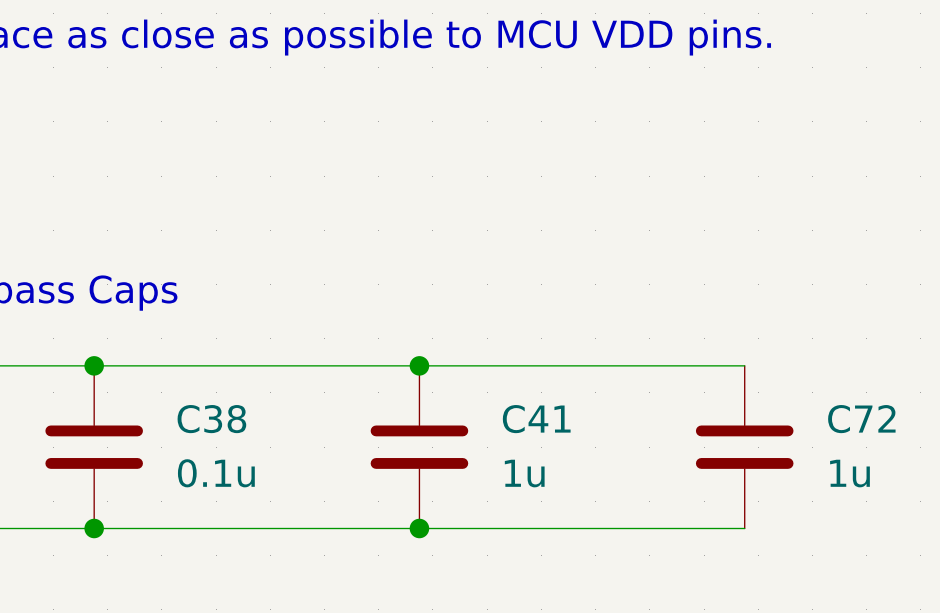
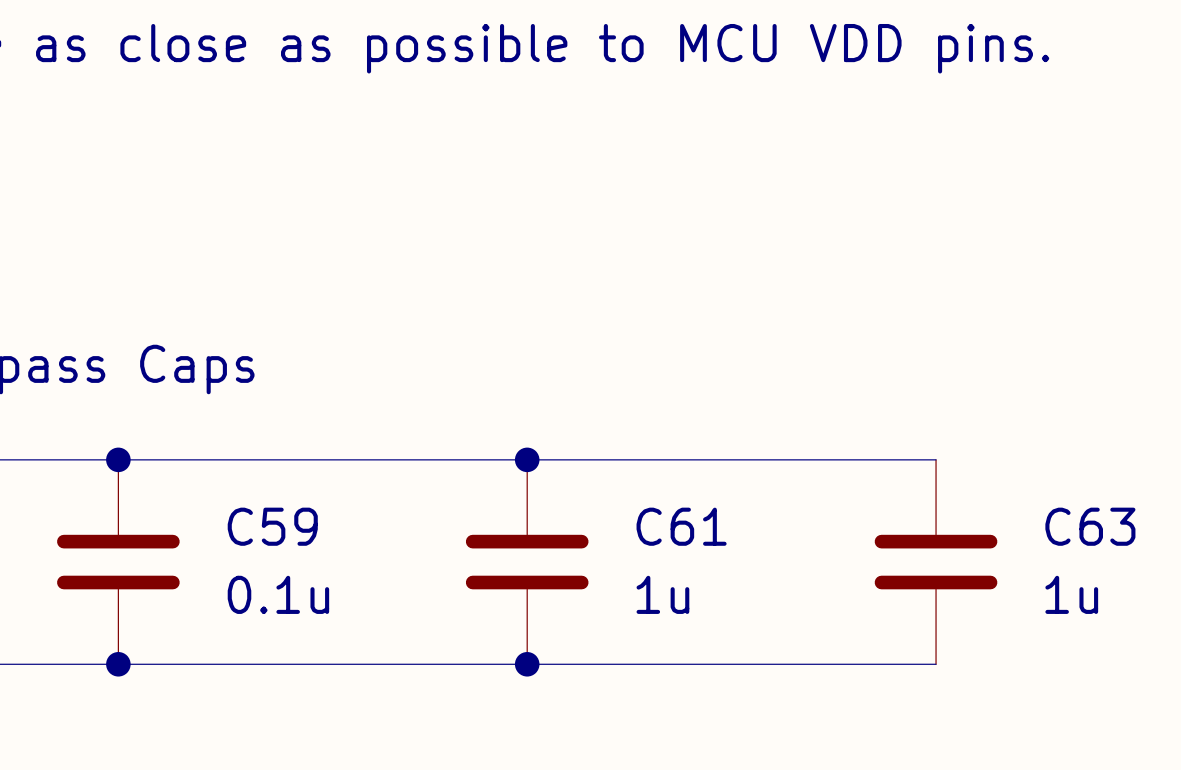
C38 name: C38 (211, 419) -> C59 (272, 526)
C41 name: C41 (536, 419) -> C61 (681, 526)
C72 name: C72 (861, 419) -> C63 (1090, 526)

